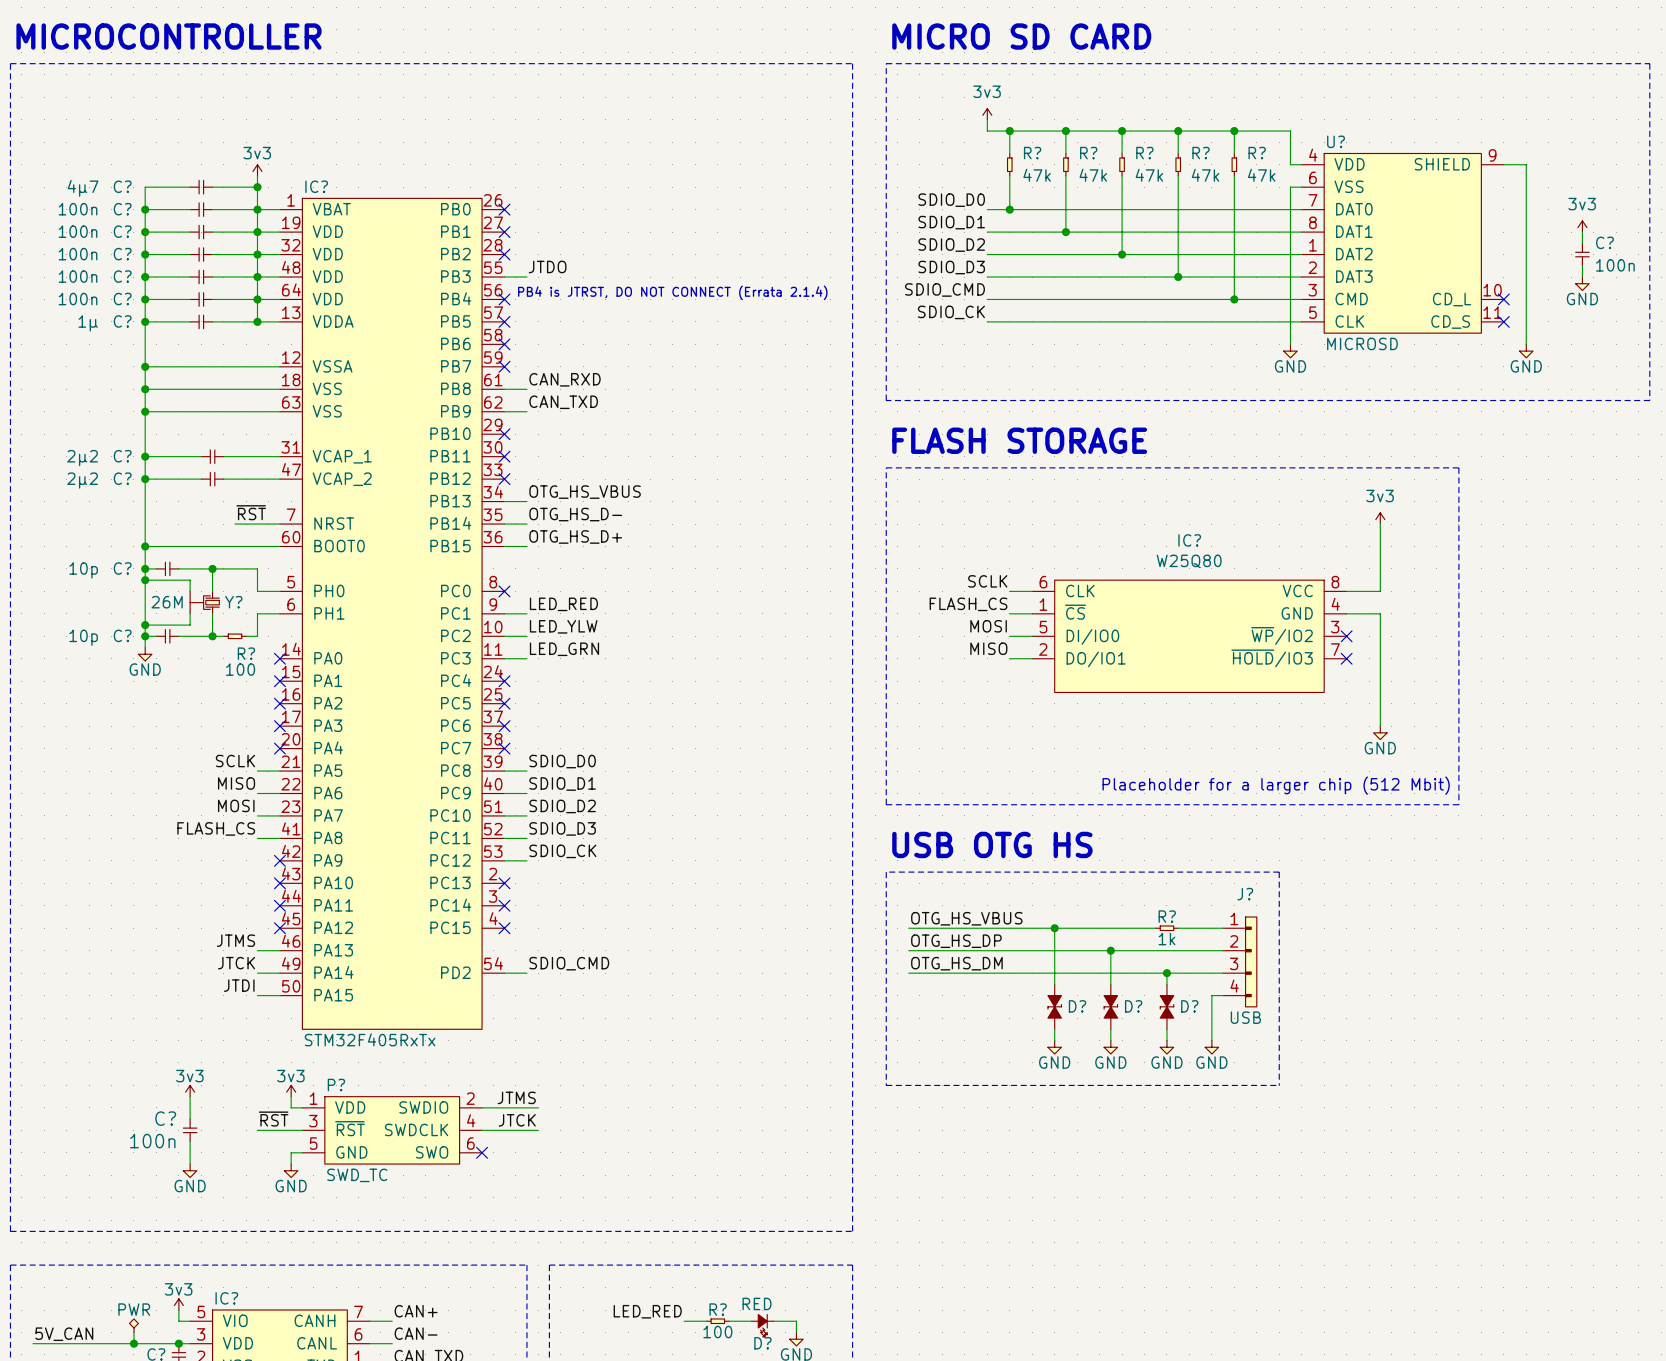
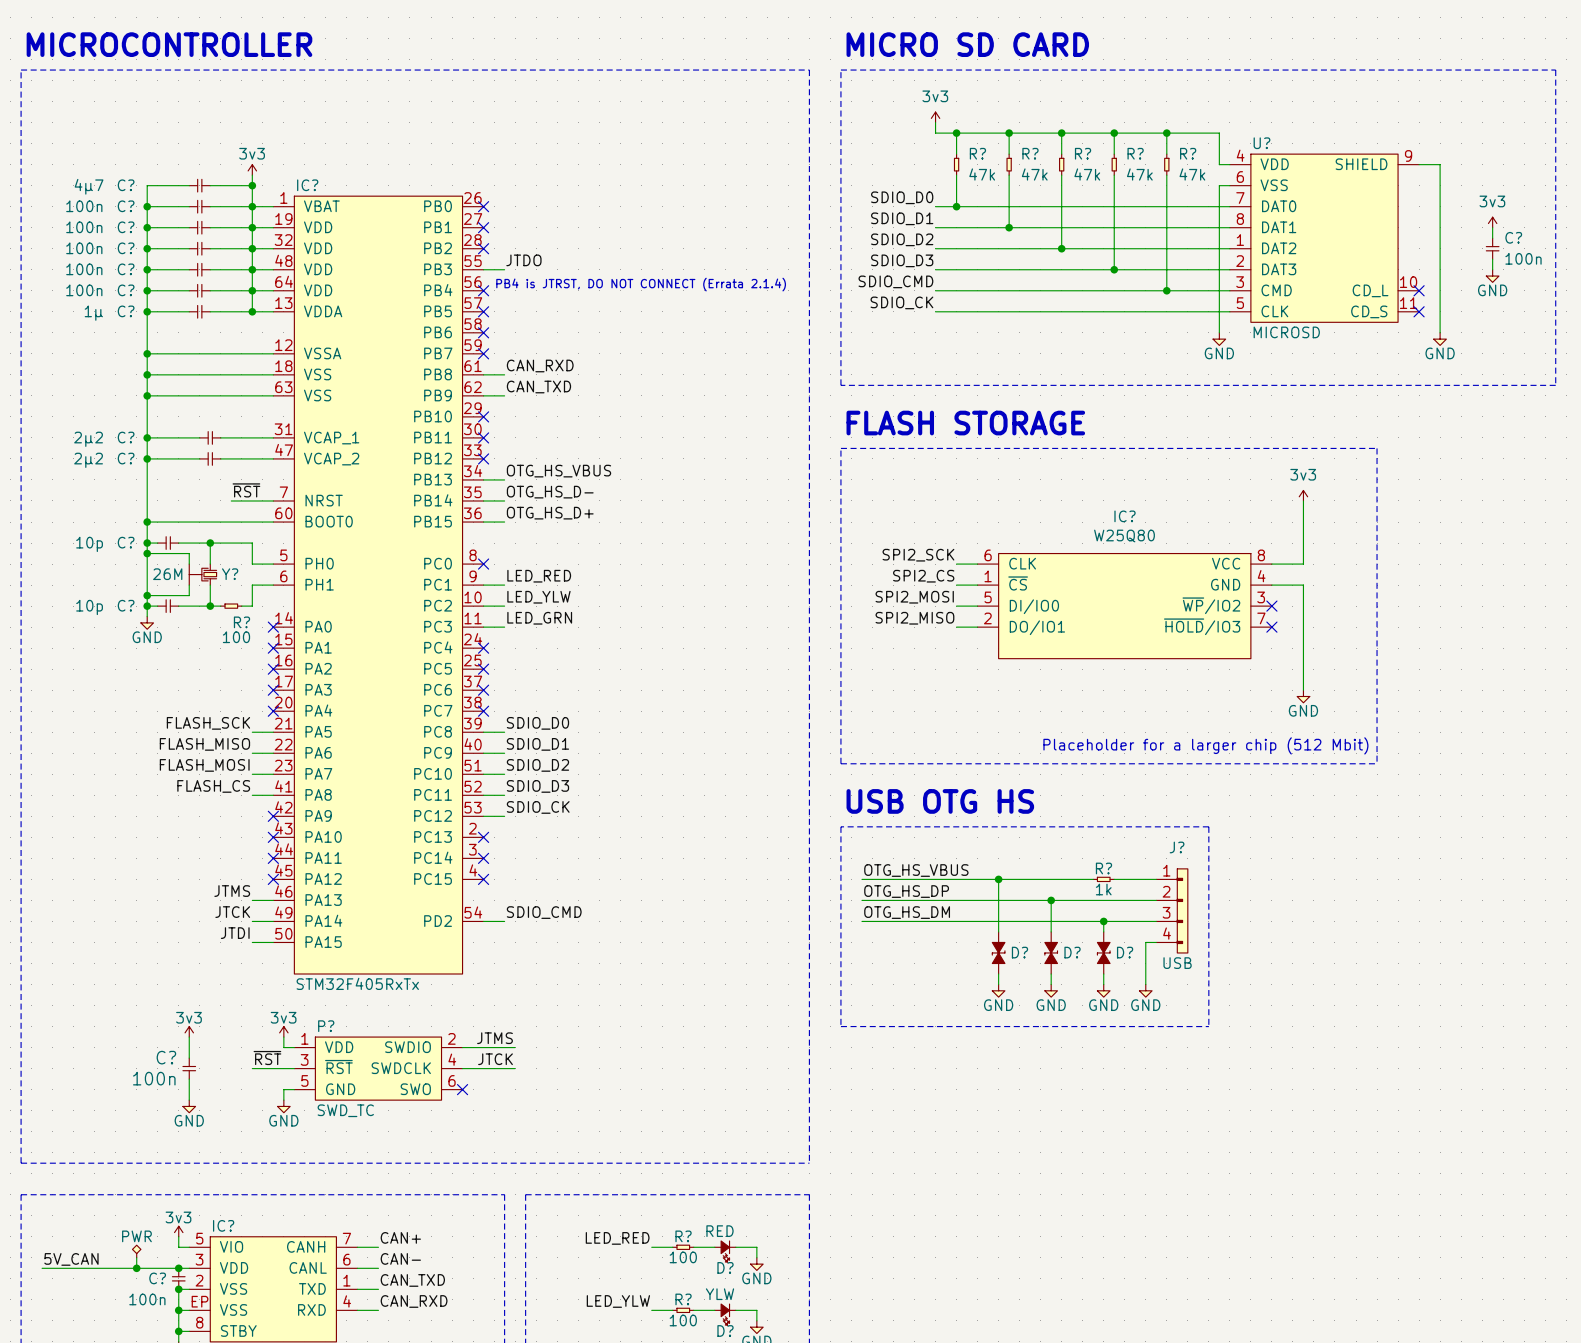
label: SCLK (987, 581) -> SPI2_SCK (918, 555)
label: FLASH_CS (968, 604) -> SPI2_CS (923, 576)
label: MOSI (988, 626) -> SPI2_MOSI (914, 597)
label: MISO (988, 648) -> SPI2_MISO (914, 618)
label: SCLK (235, 761) -> FLASH_SCK (208, 723)
label: MISO (236, 783) -> FLASH_MISO (204, 744)
label: MOSI (236, 805) -> FLASH_MOSI (204, 765)

